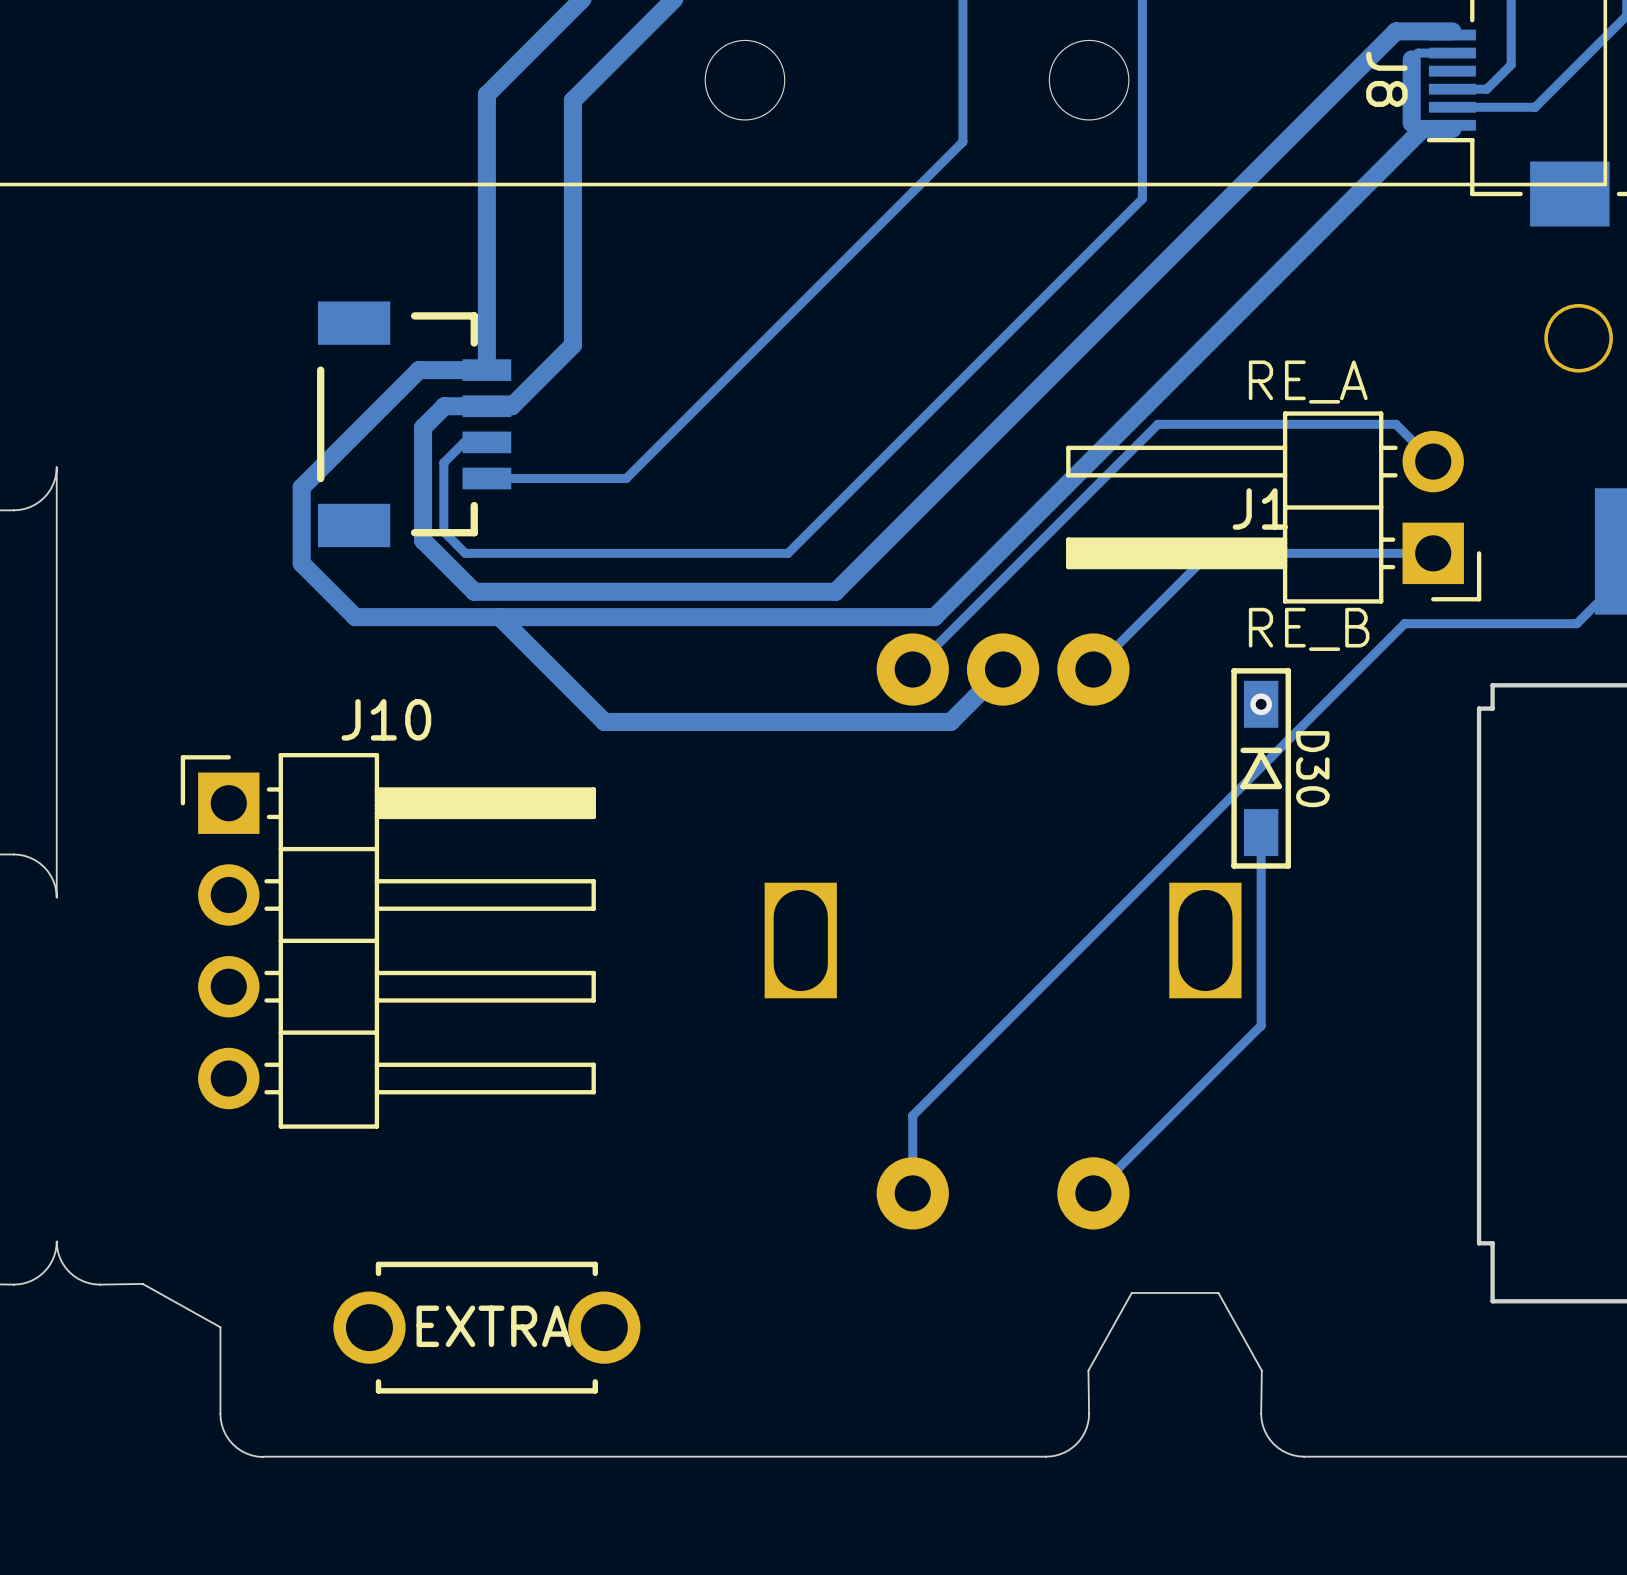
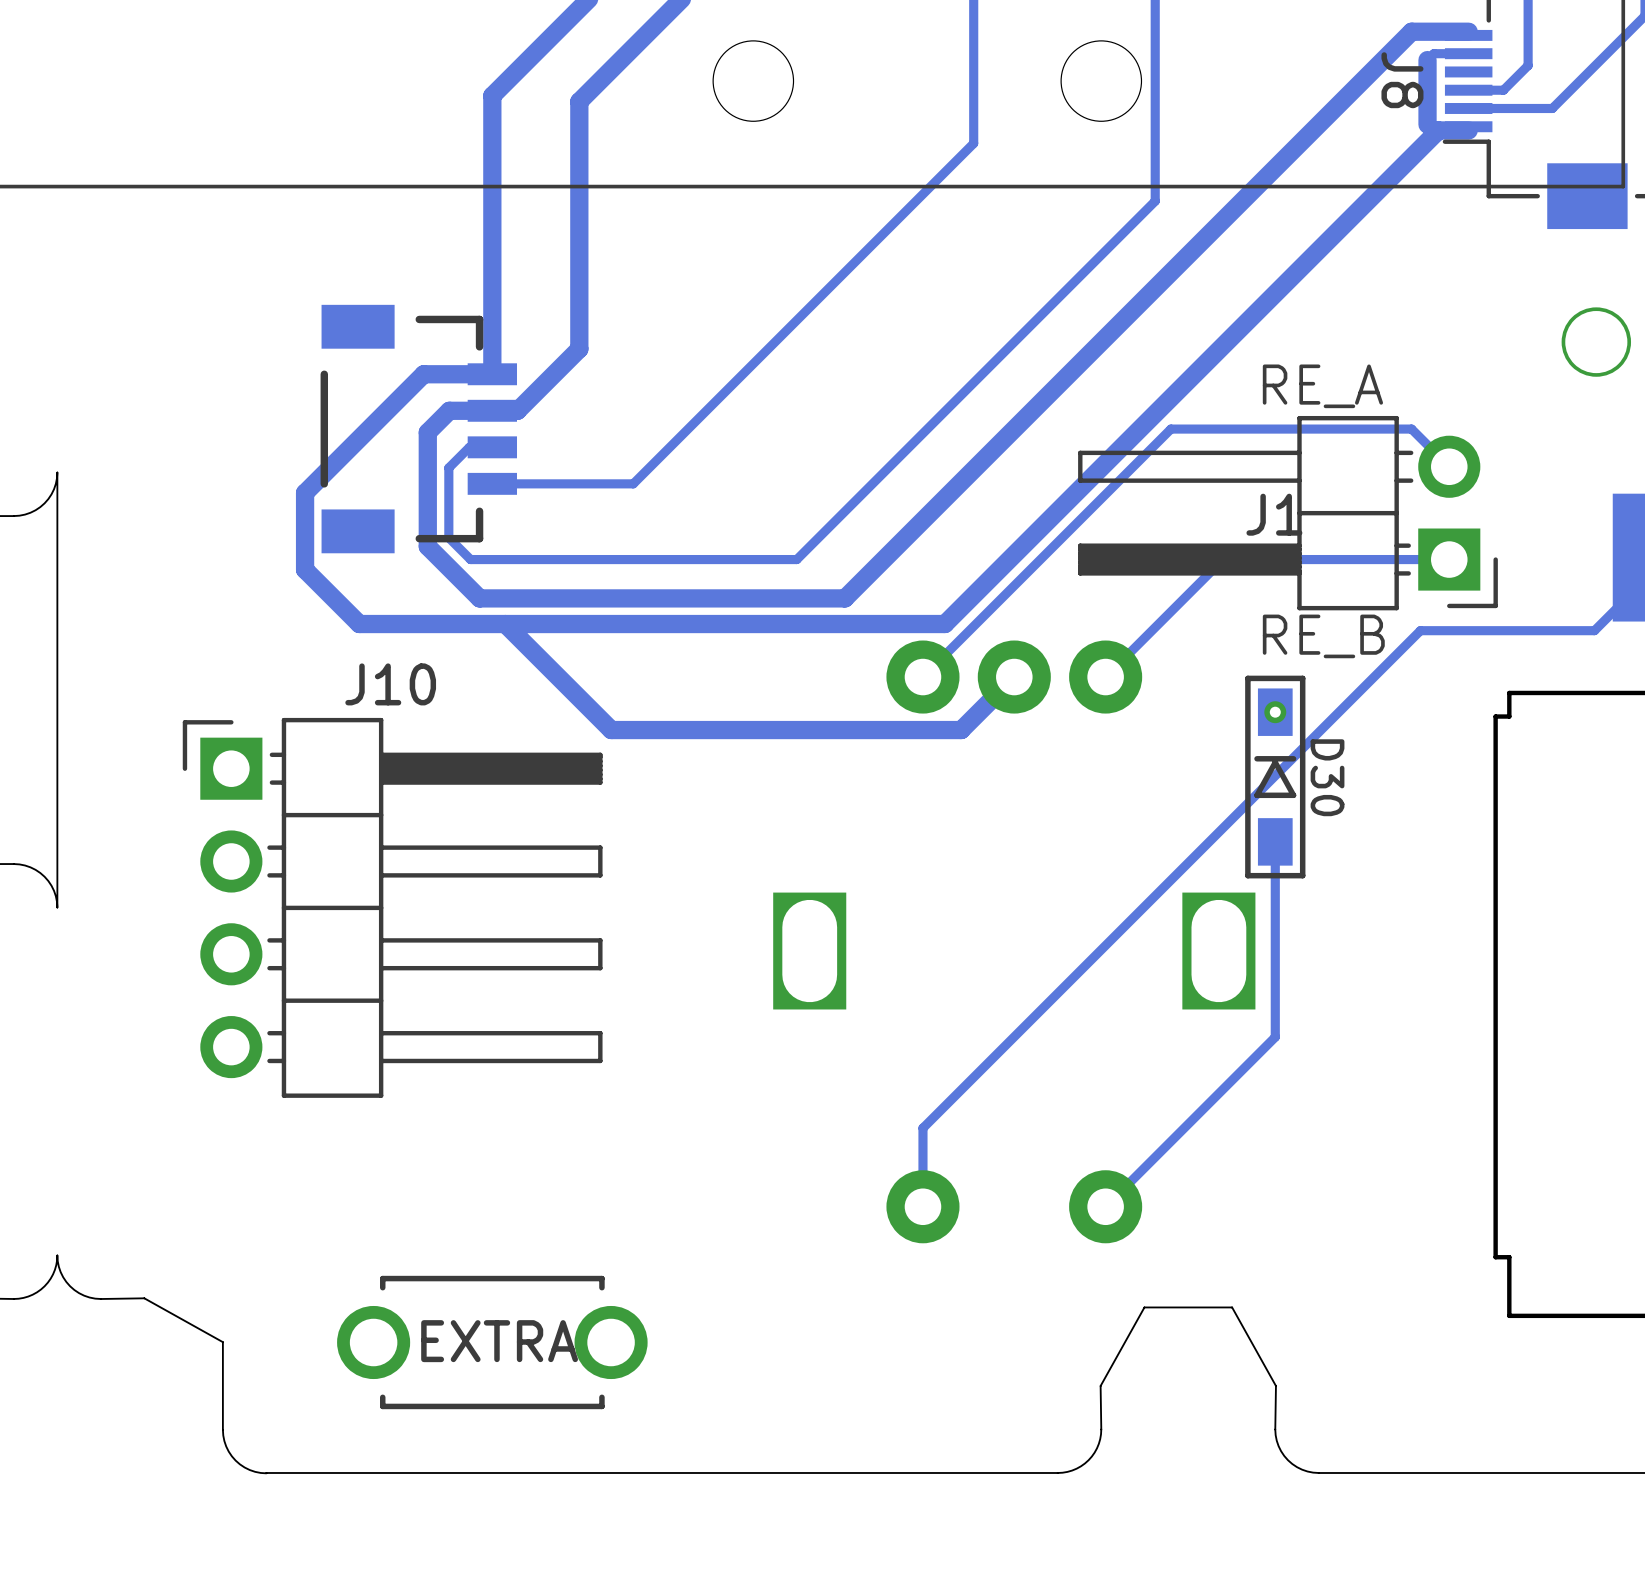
J10 position: (388, 940) -> (392, 907)

